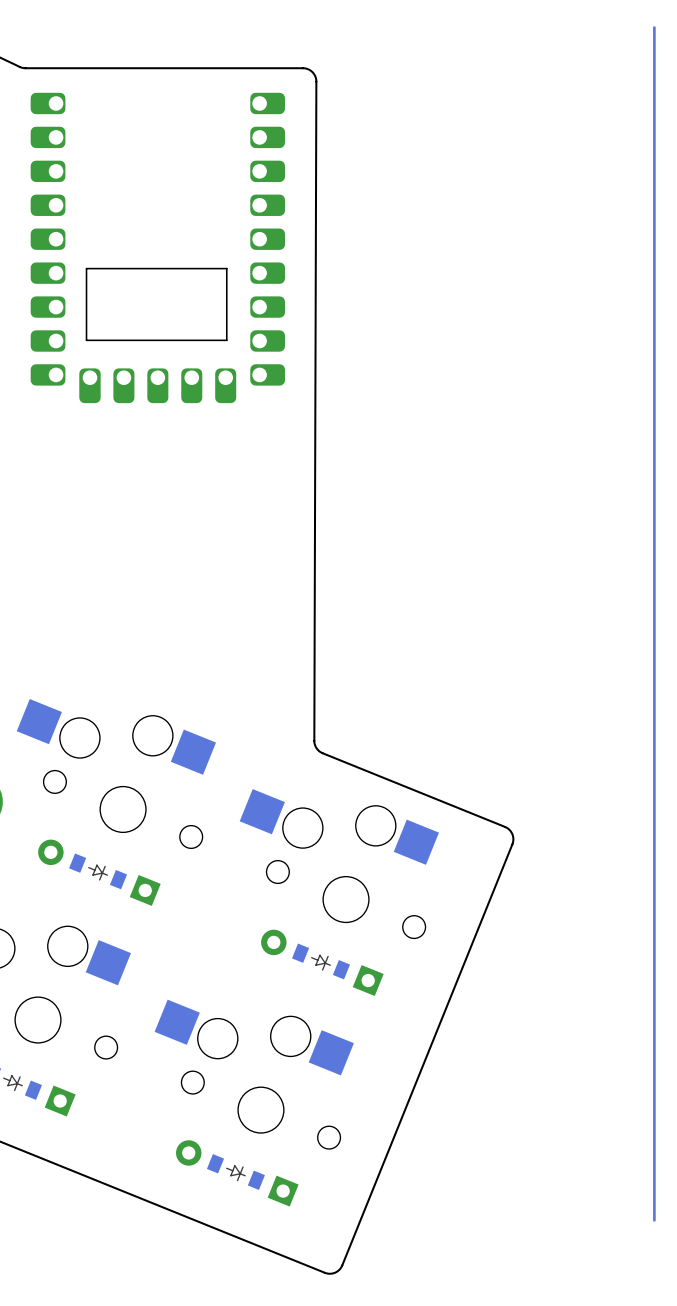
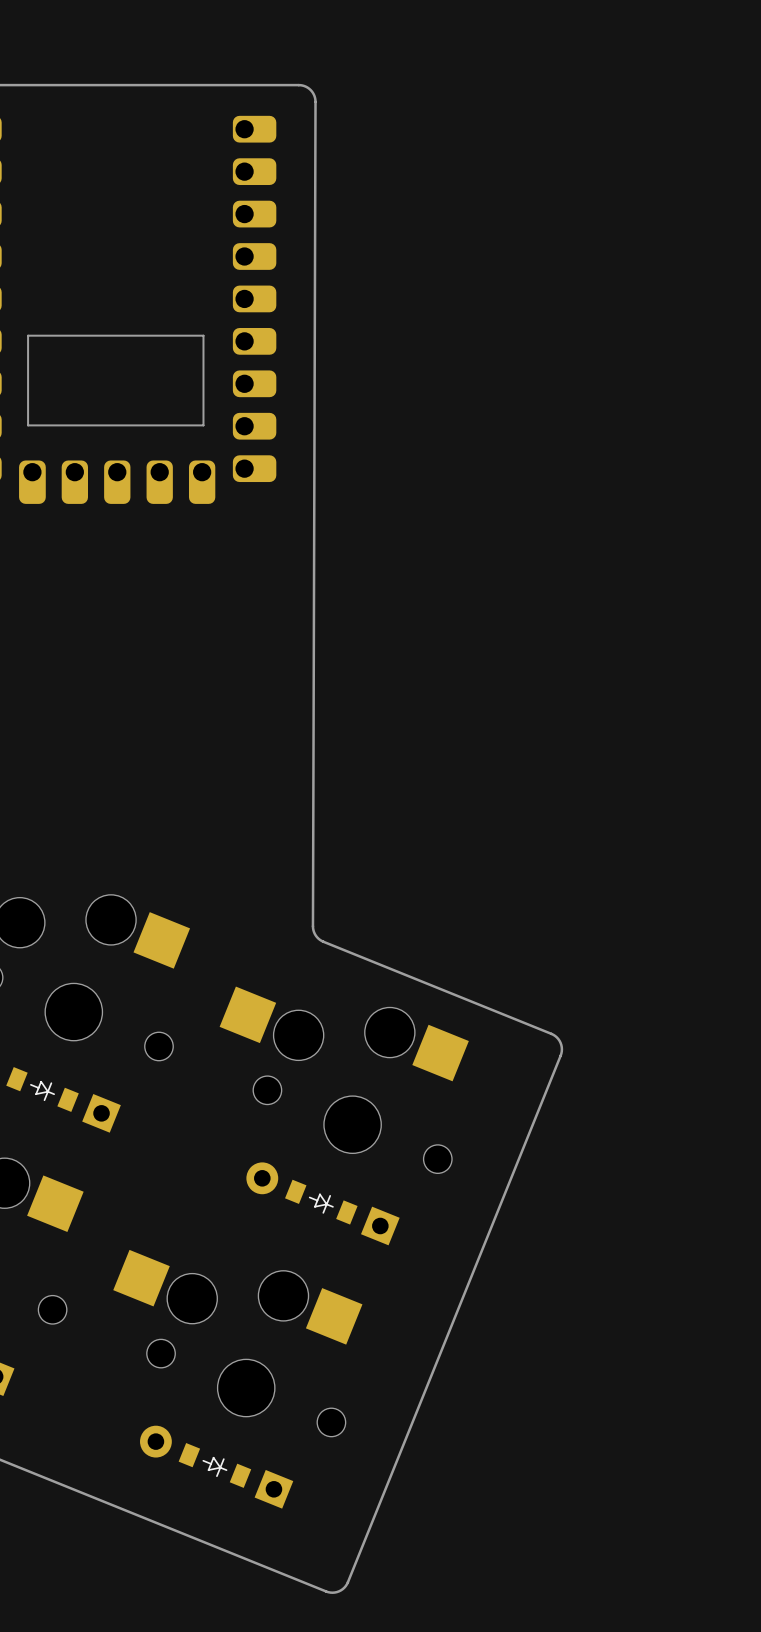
track: (654, 27) (654, 1220) -> none

